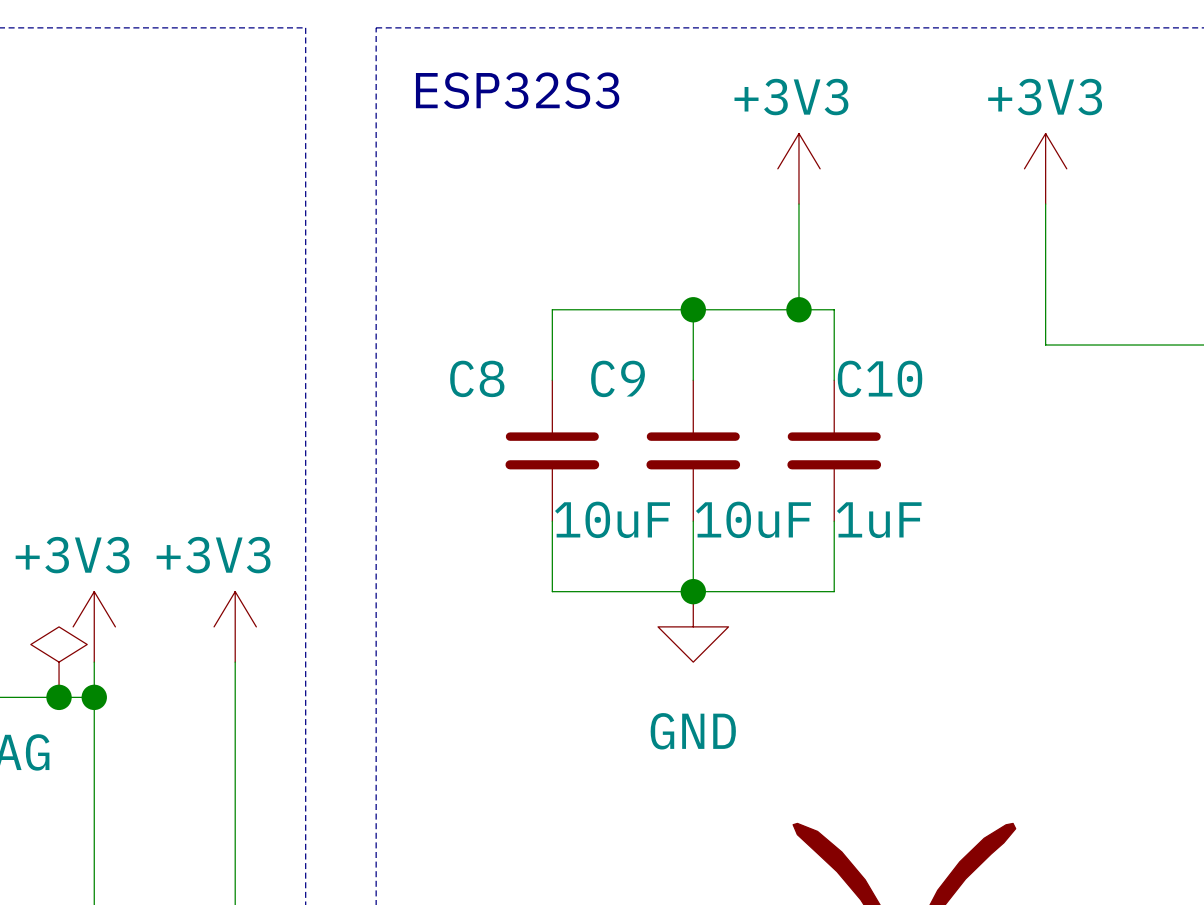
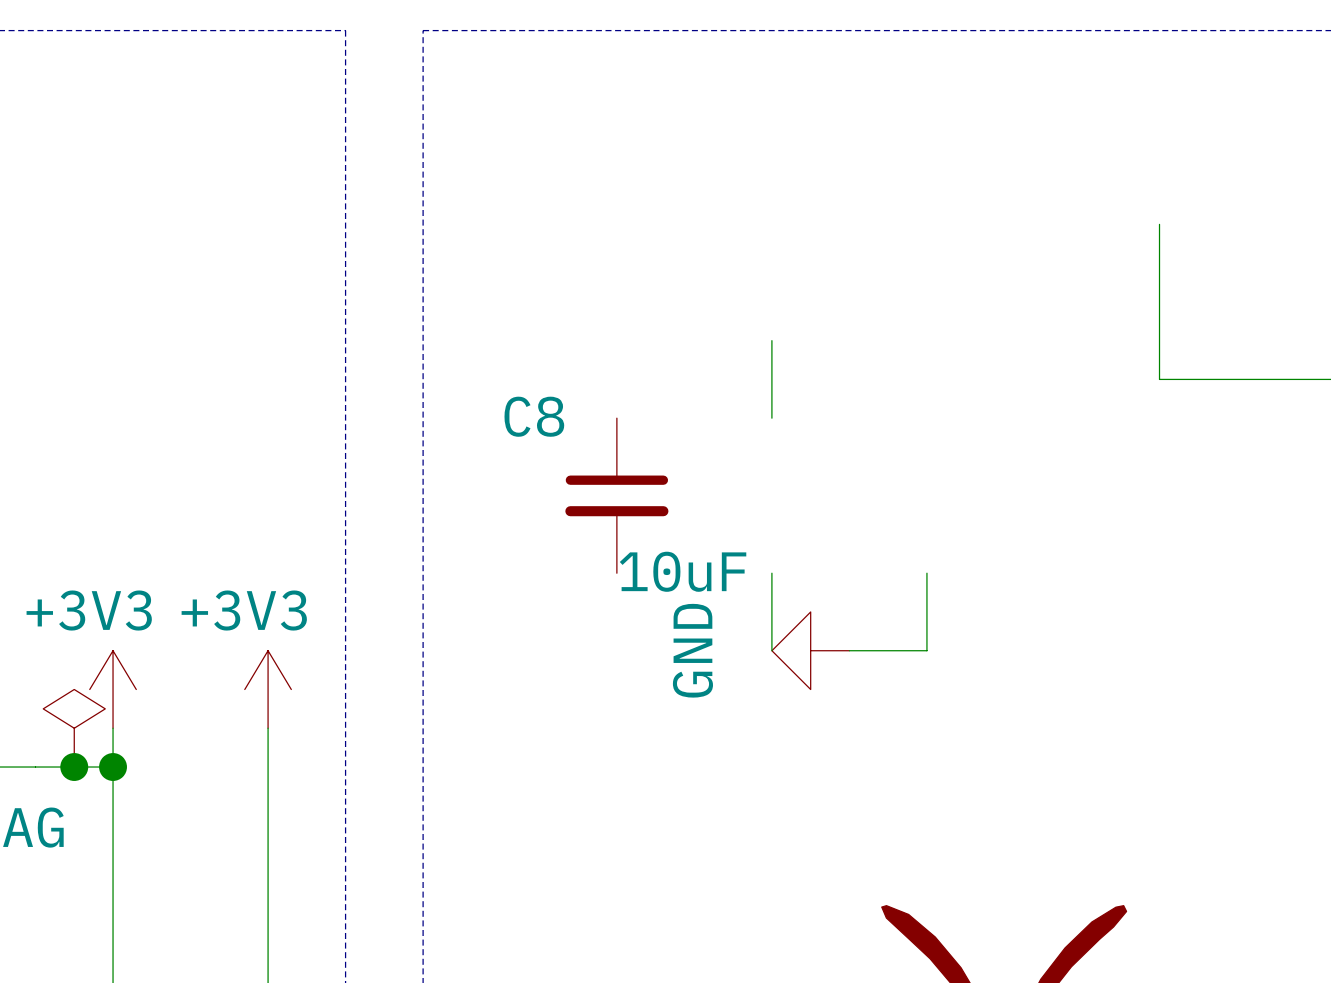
text: ESP32S3 (517, 90) -> none
power symbol: +3V3 (798, 168) -> none
power symbol: +3V3 (1045, 168) -> none
wire: (798, 204) (798, 309) -> none
junction: (693, 309) -> none
junction: (798, 309) -> none
wire: (552, 380) (552, 309) (834, 309) (834, 380) -> none
C9: 10uF (693, 450) -> none
C10: 1uF (834, 450) -> none
wire: (552, 521) (552, 591) (763, 591) -> none
junction: (693, 591) -> none
power symbol rotation: 0° (693, 626) -> 90° clockwise (810, 650)
power symbol position: GND (693, 626) -> GND (810, 650)

